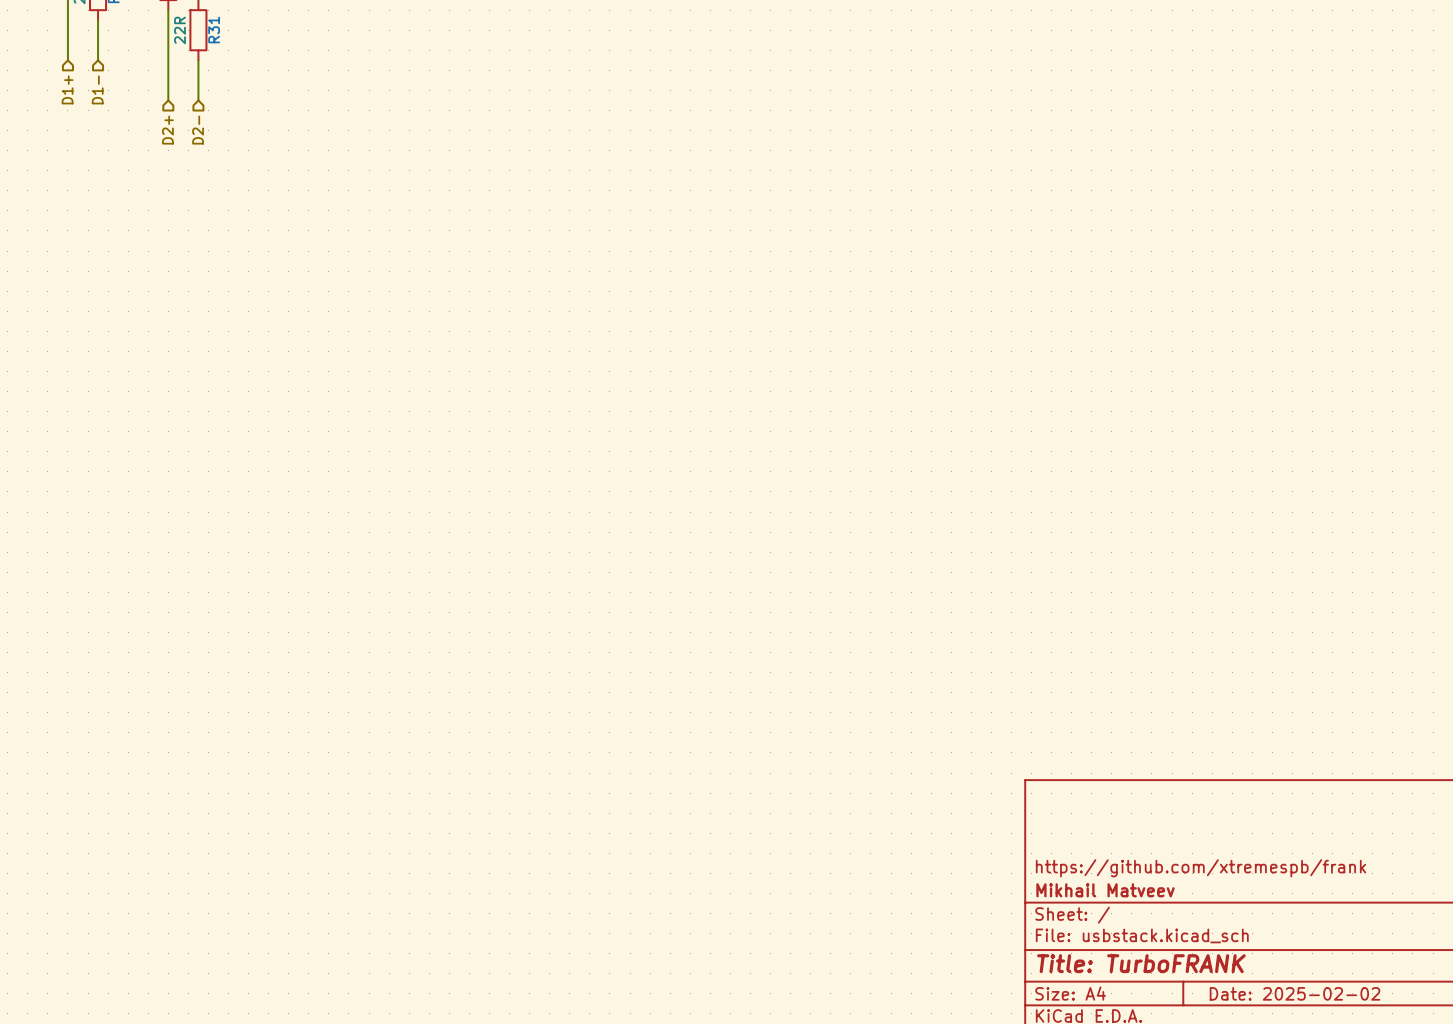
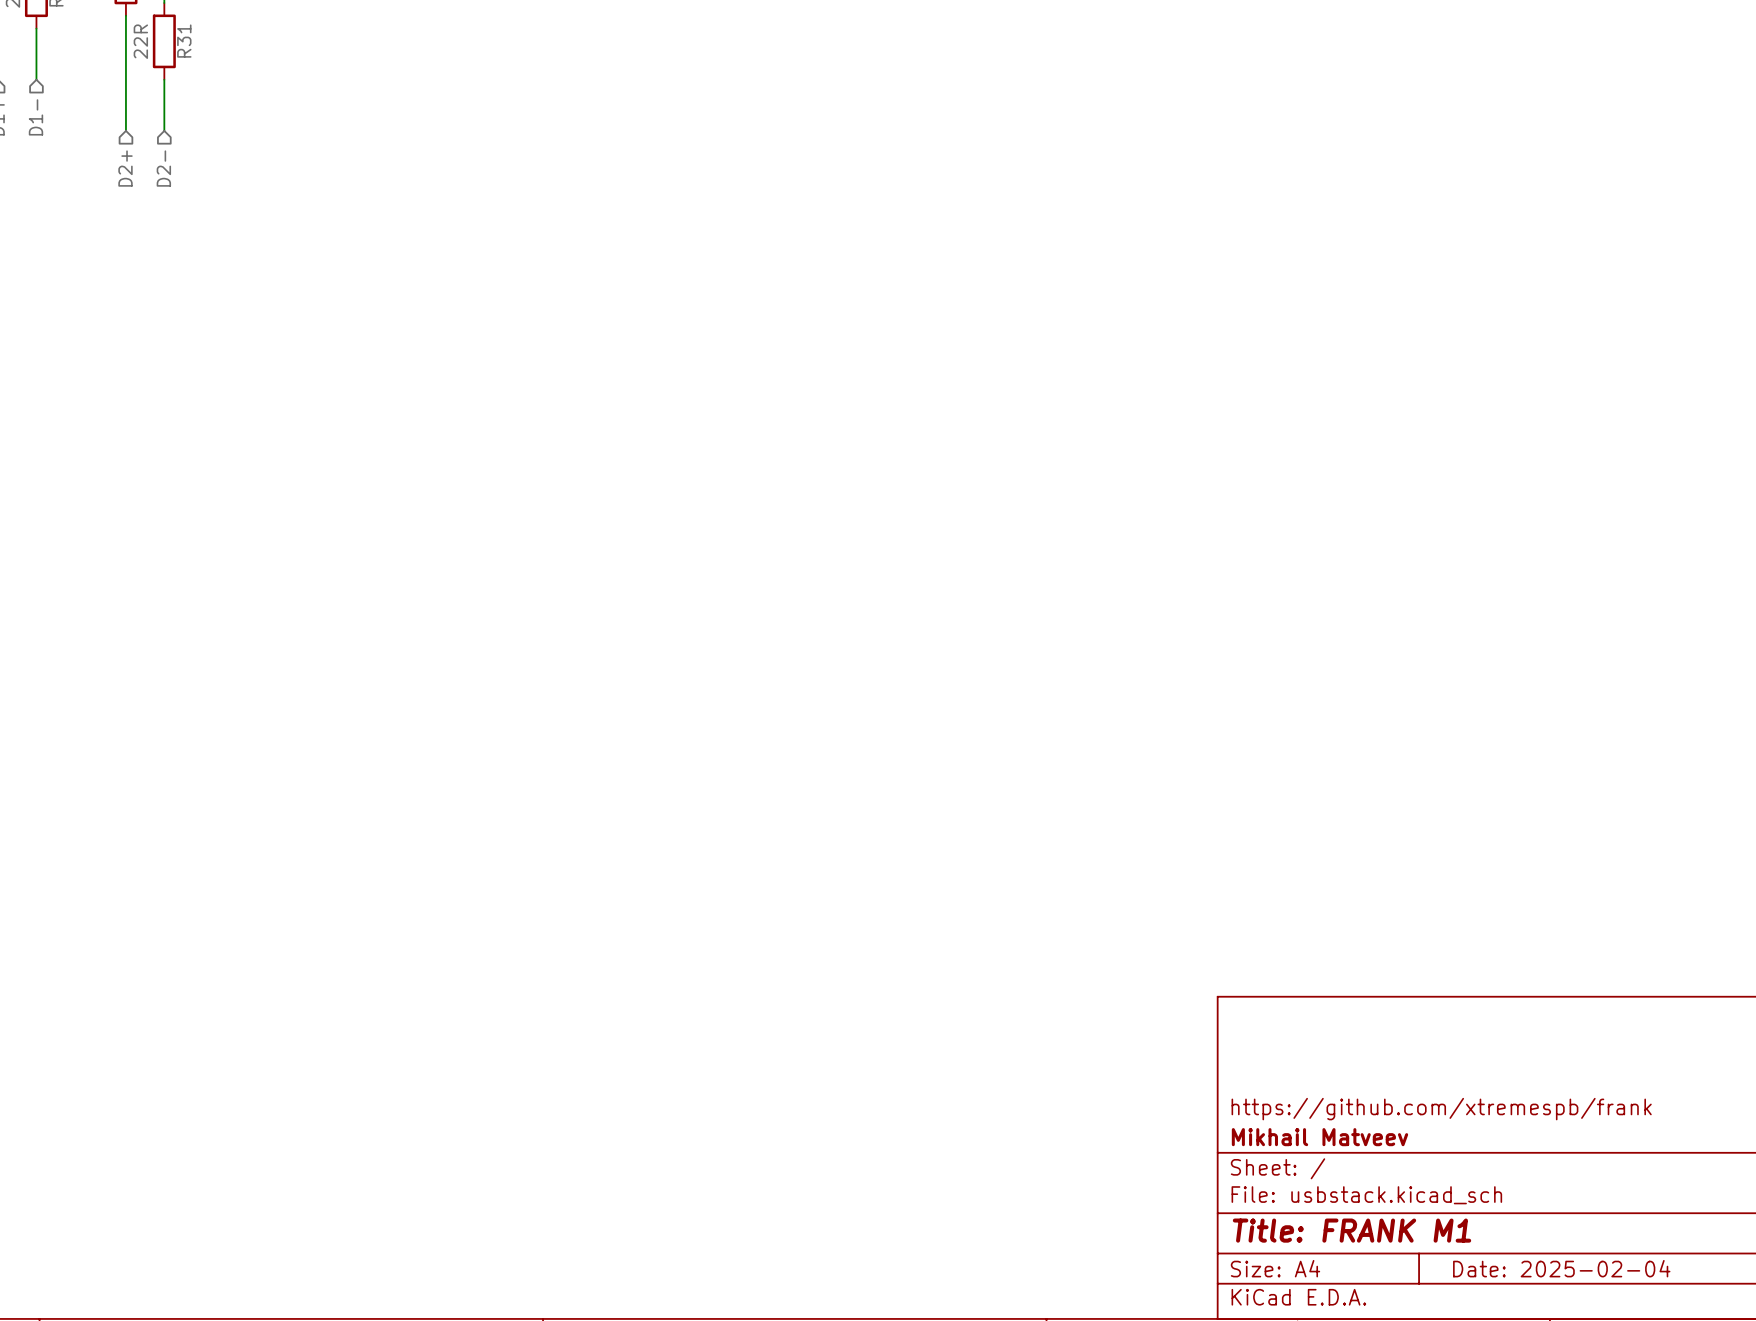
title block: Title: TurboFRANK (1141, 963) -> Title: FRANK M1 (1352, 1230)
title block: Date: 2025-02-02 (1295, 993) -> Date: 2025-02-04 (1561, 1268)

